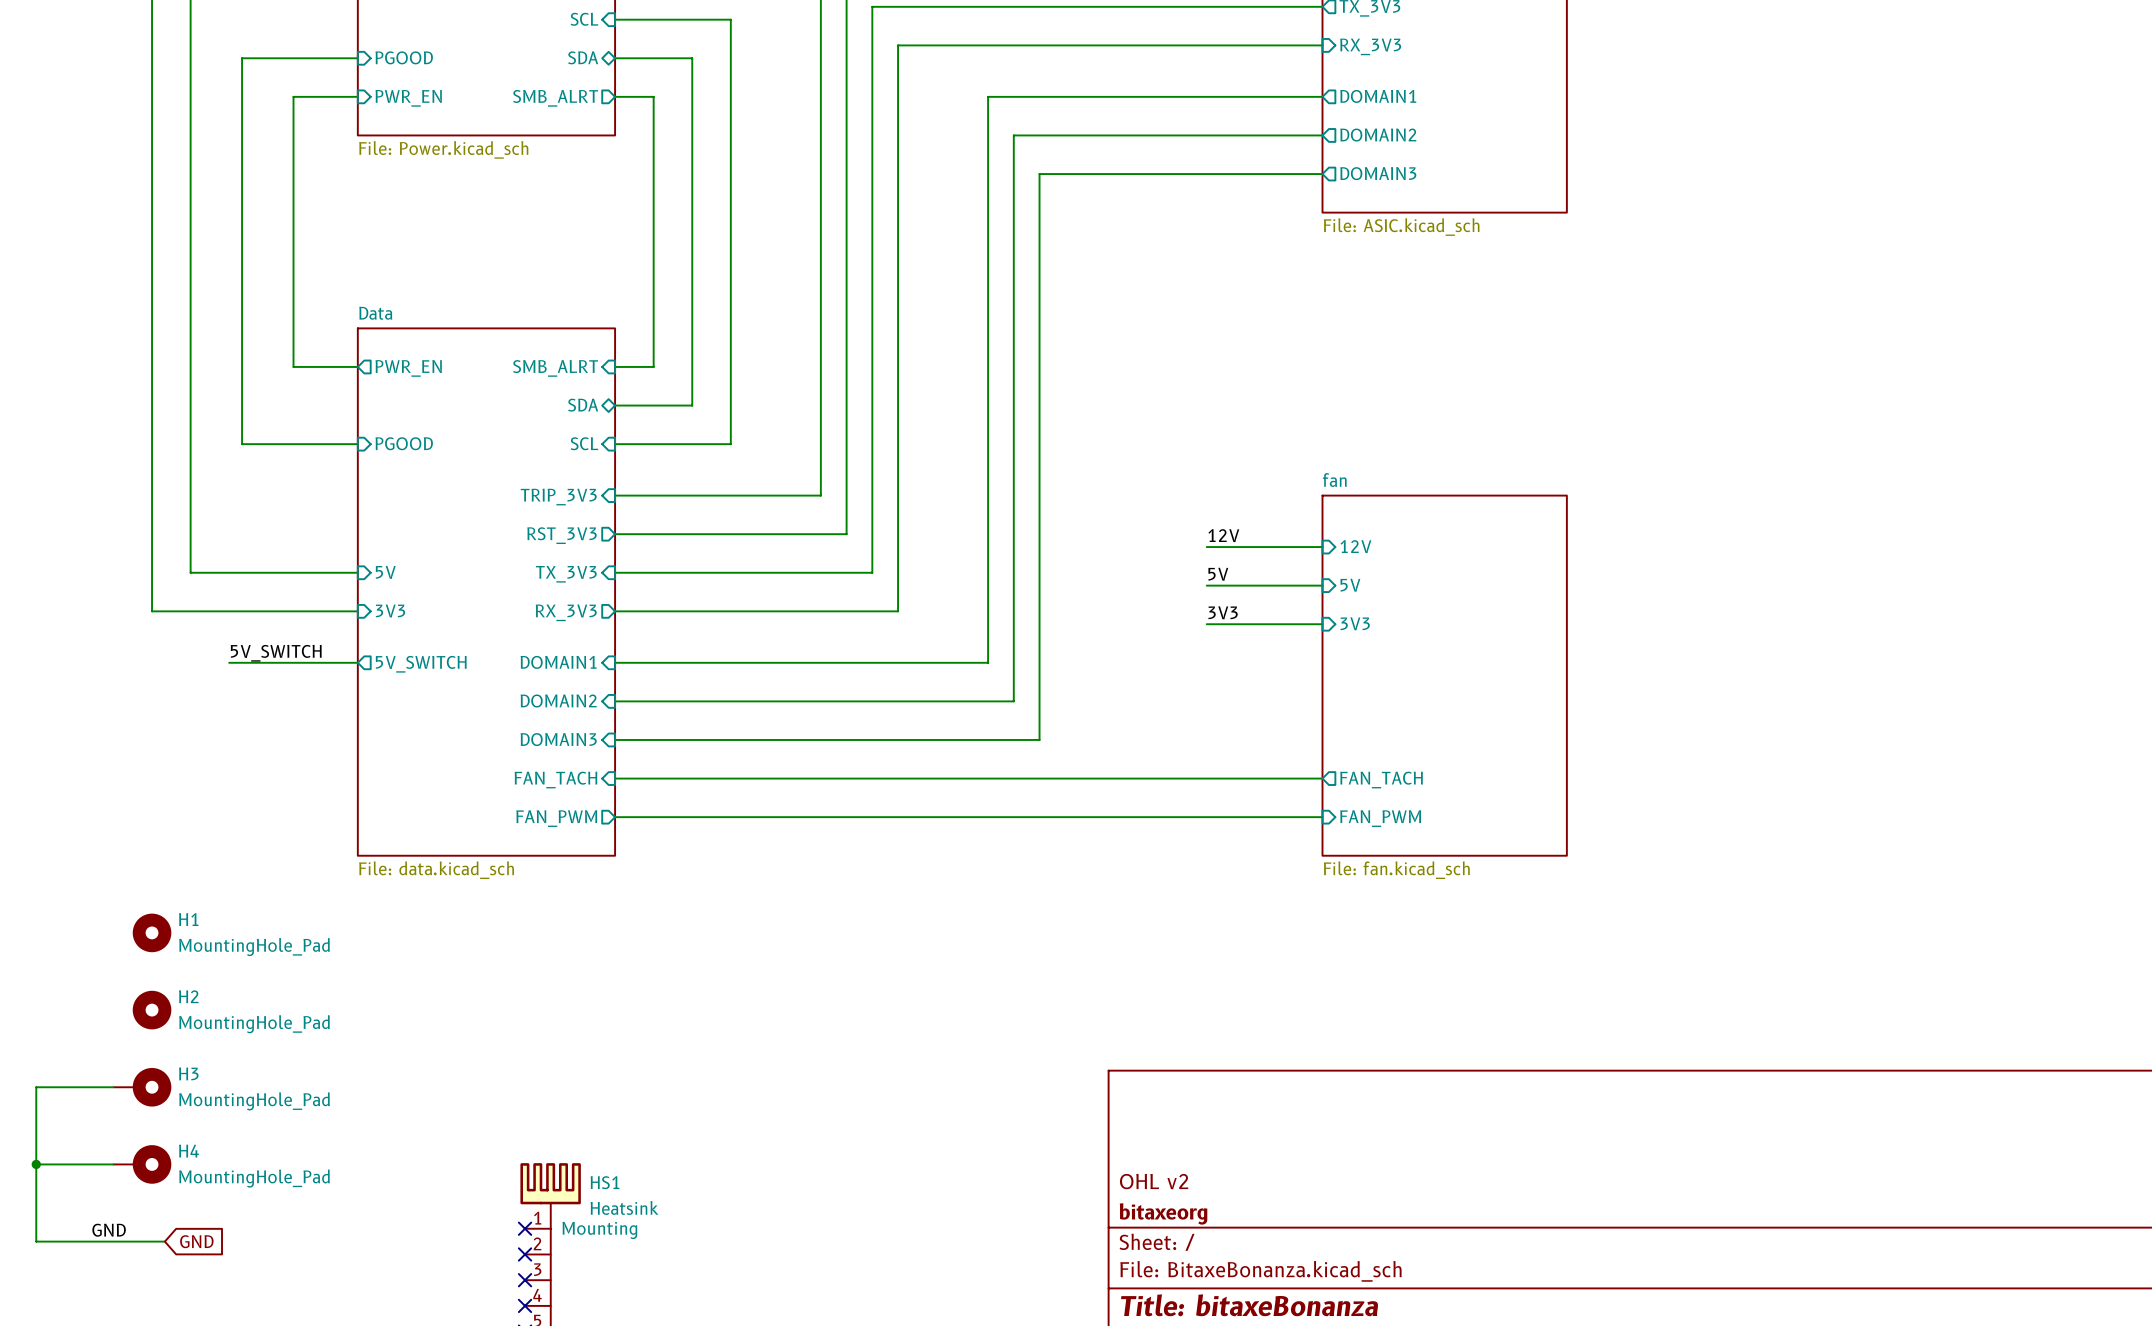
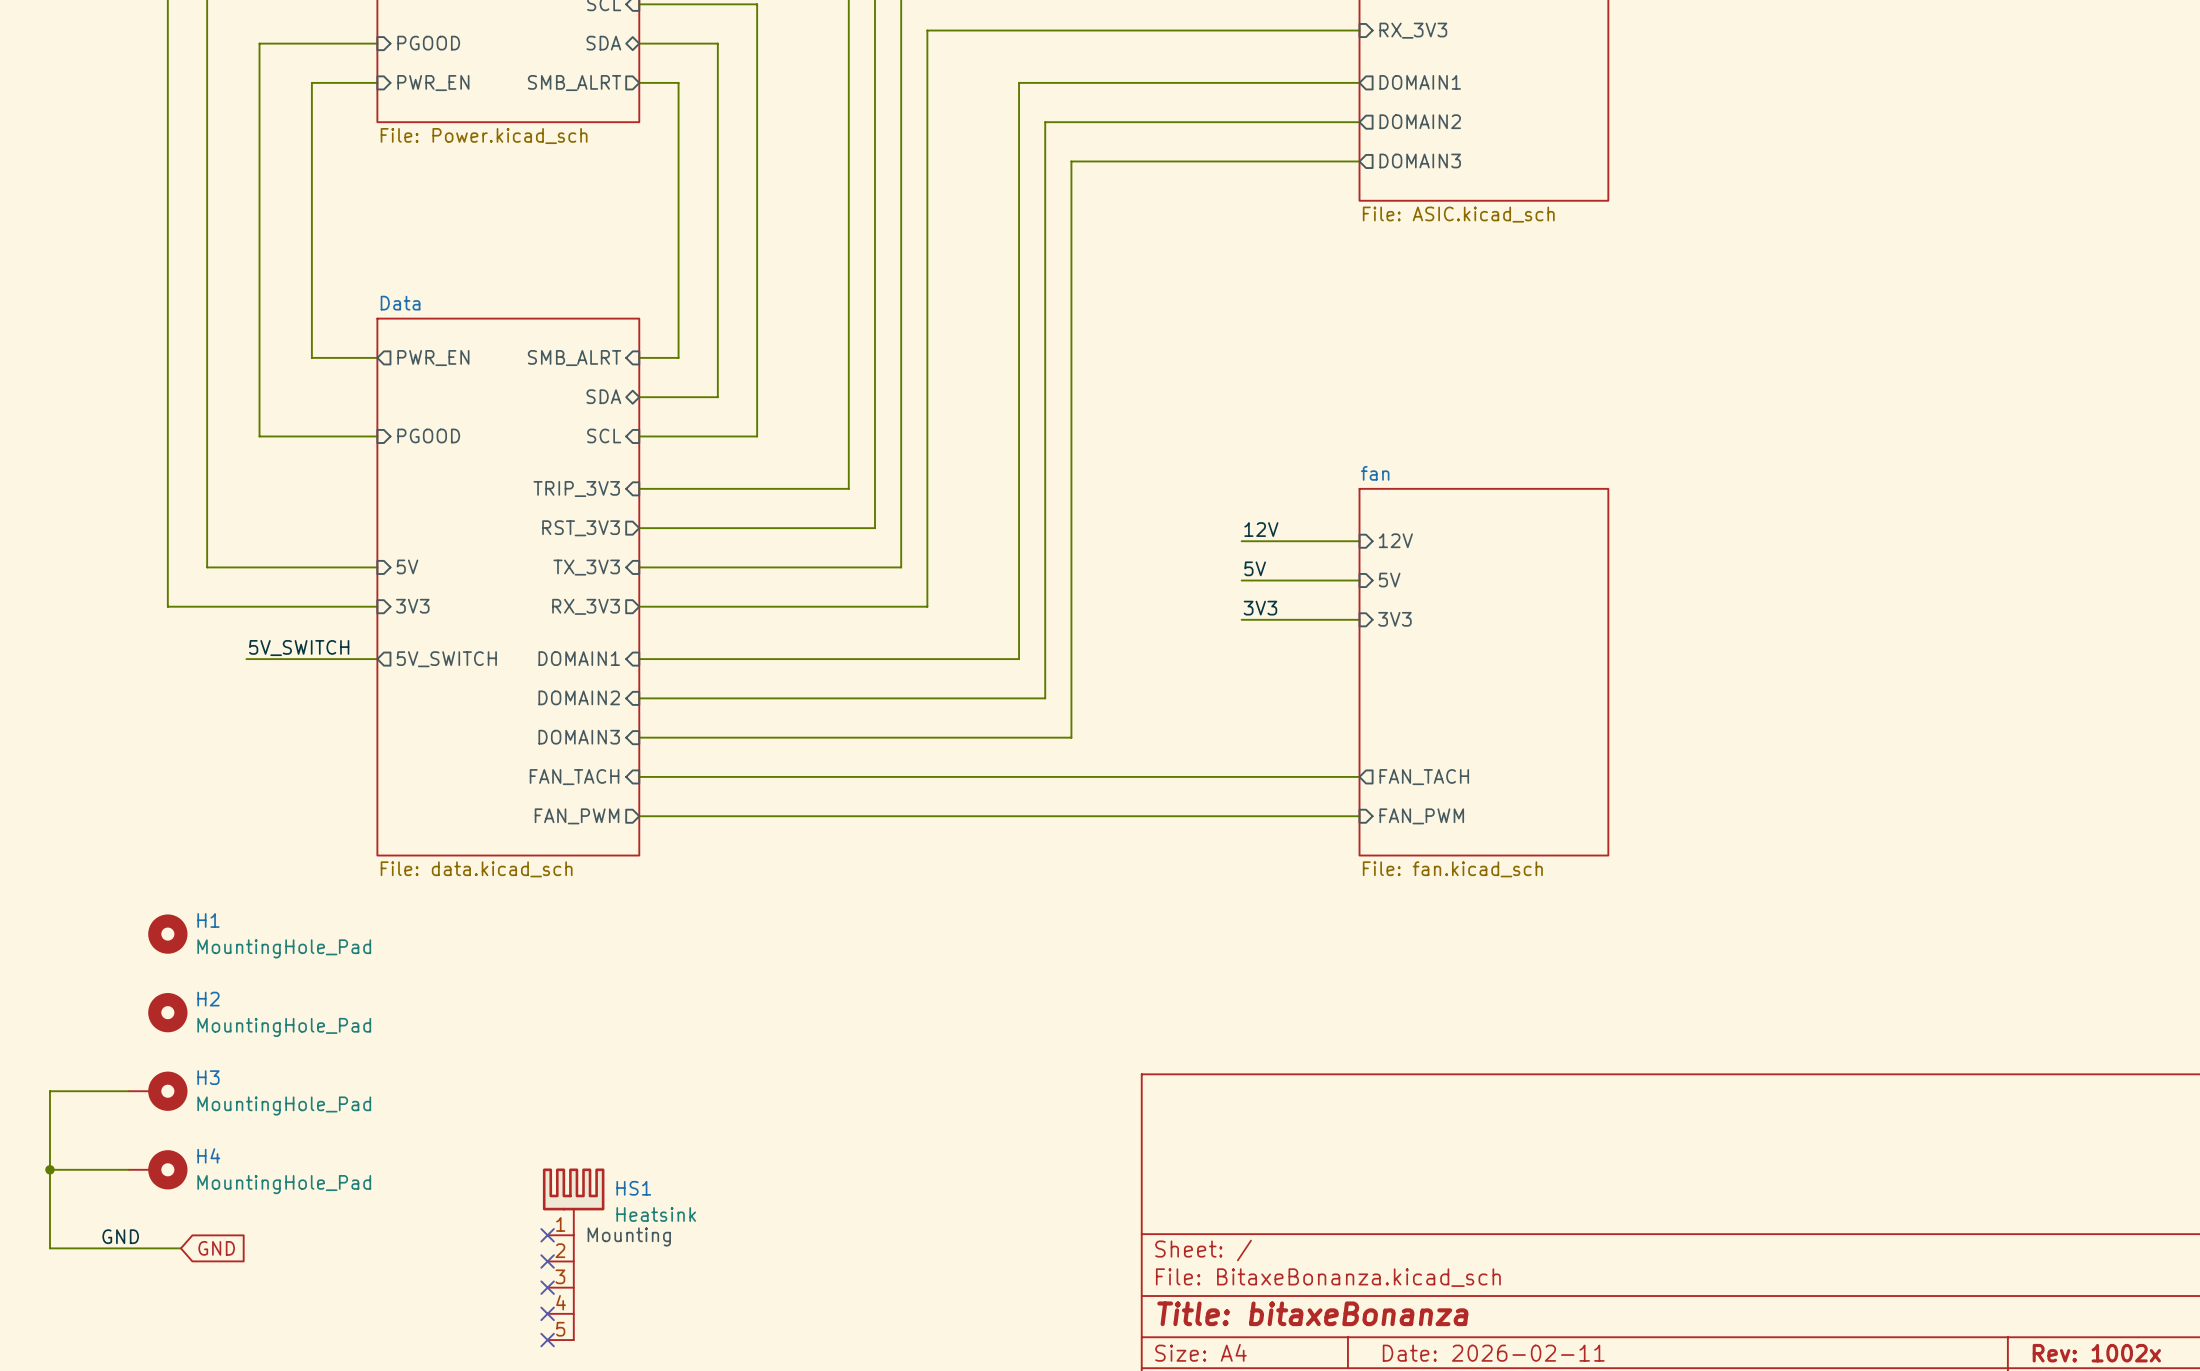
title block: OHL v2 (1154, 1181) -> none
title block: bitaxeorg (1163, 1213) -> none

